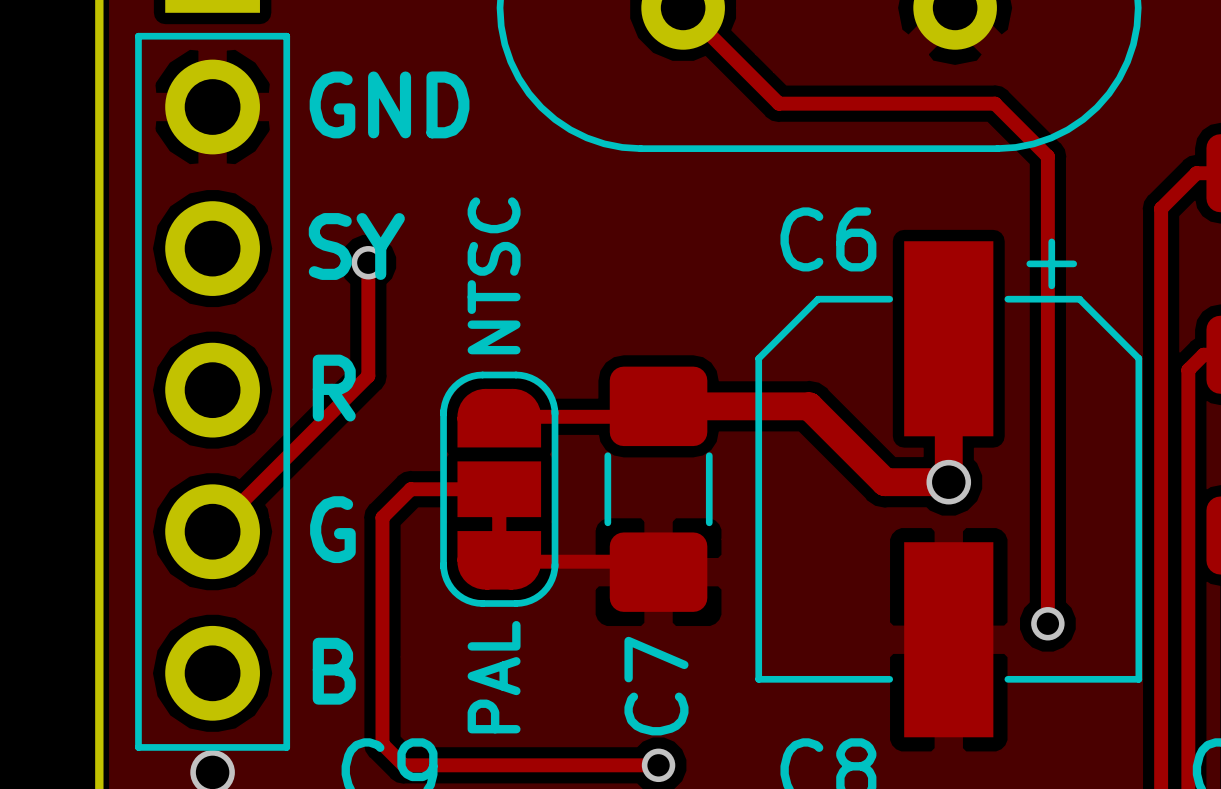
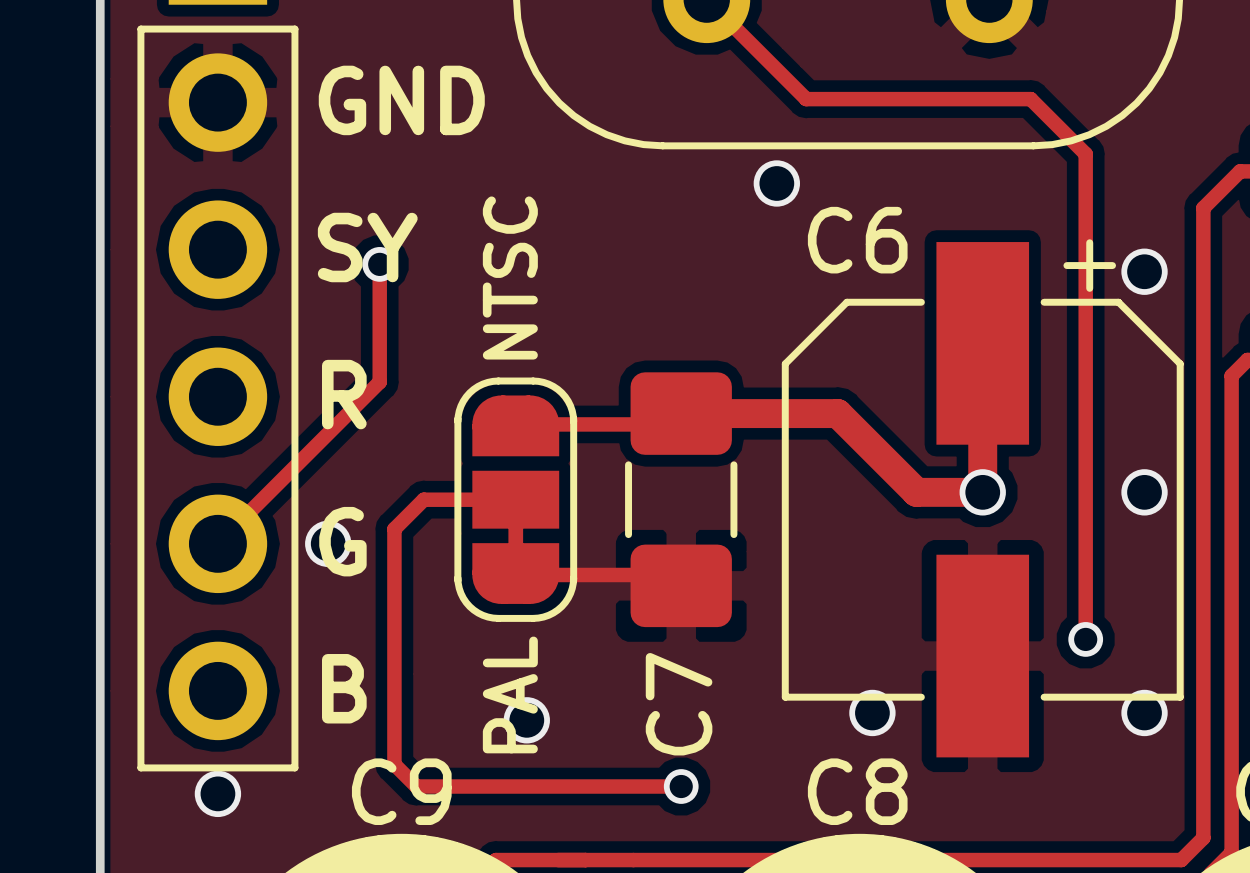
via: none -> (776, 183)
via: none -> (1144, 271)
via: none -> (1144, 492)
via: none -> (328, 543)
via: none -> (872, 712)
via: none -> (1144, 712)
via: none -> (526, 720)

